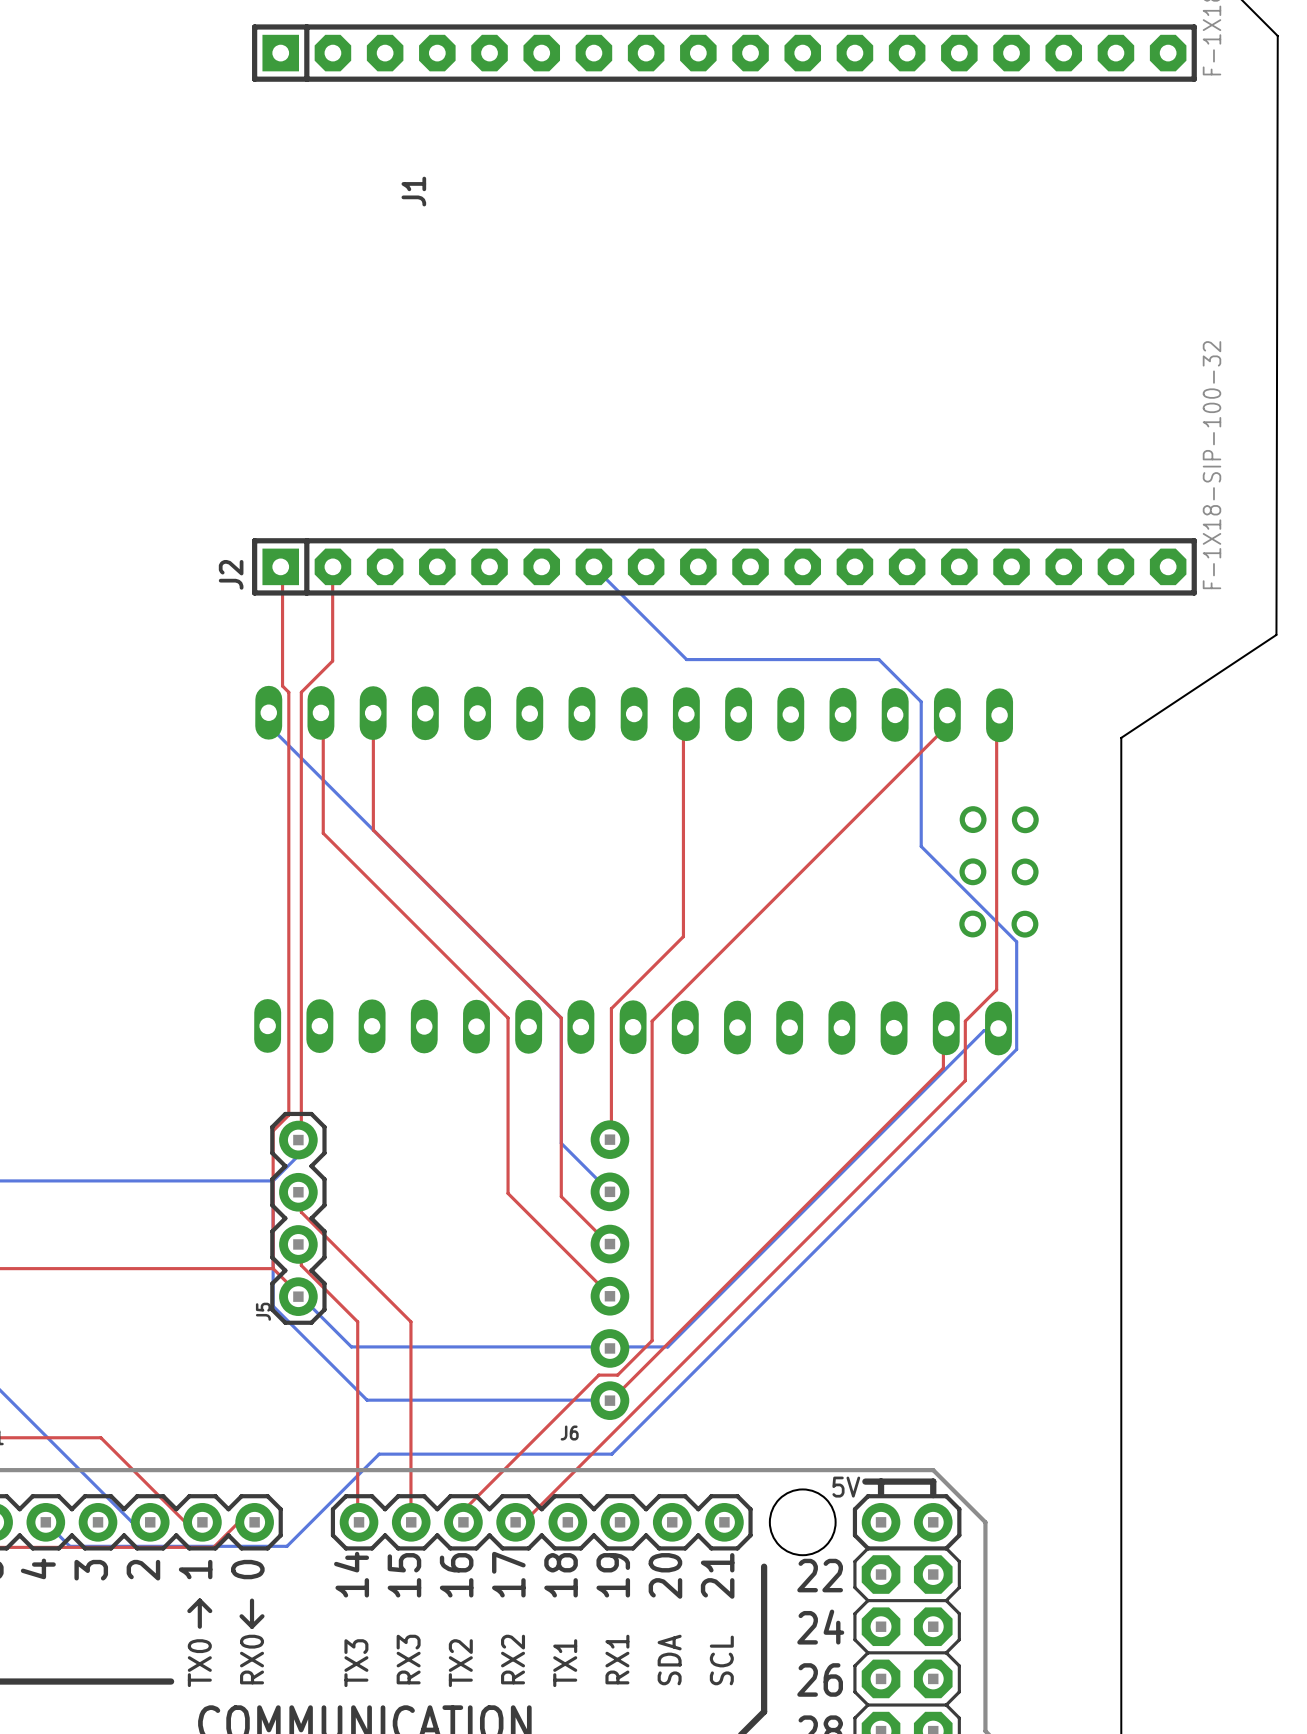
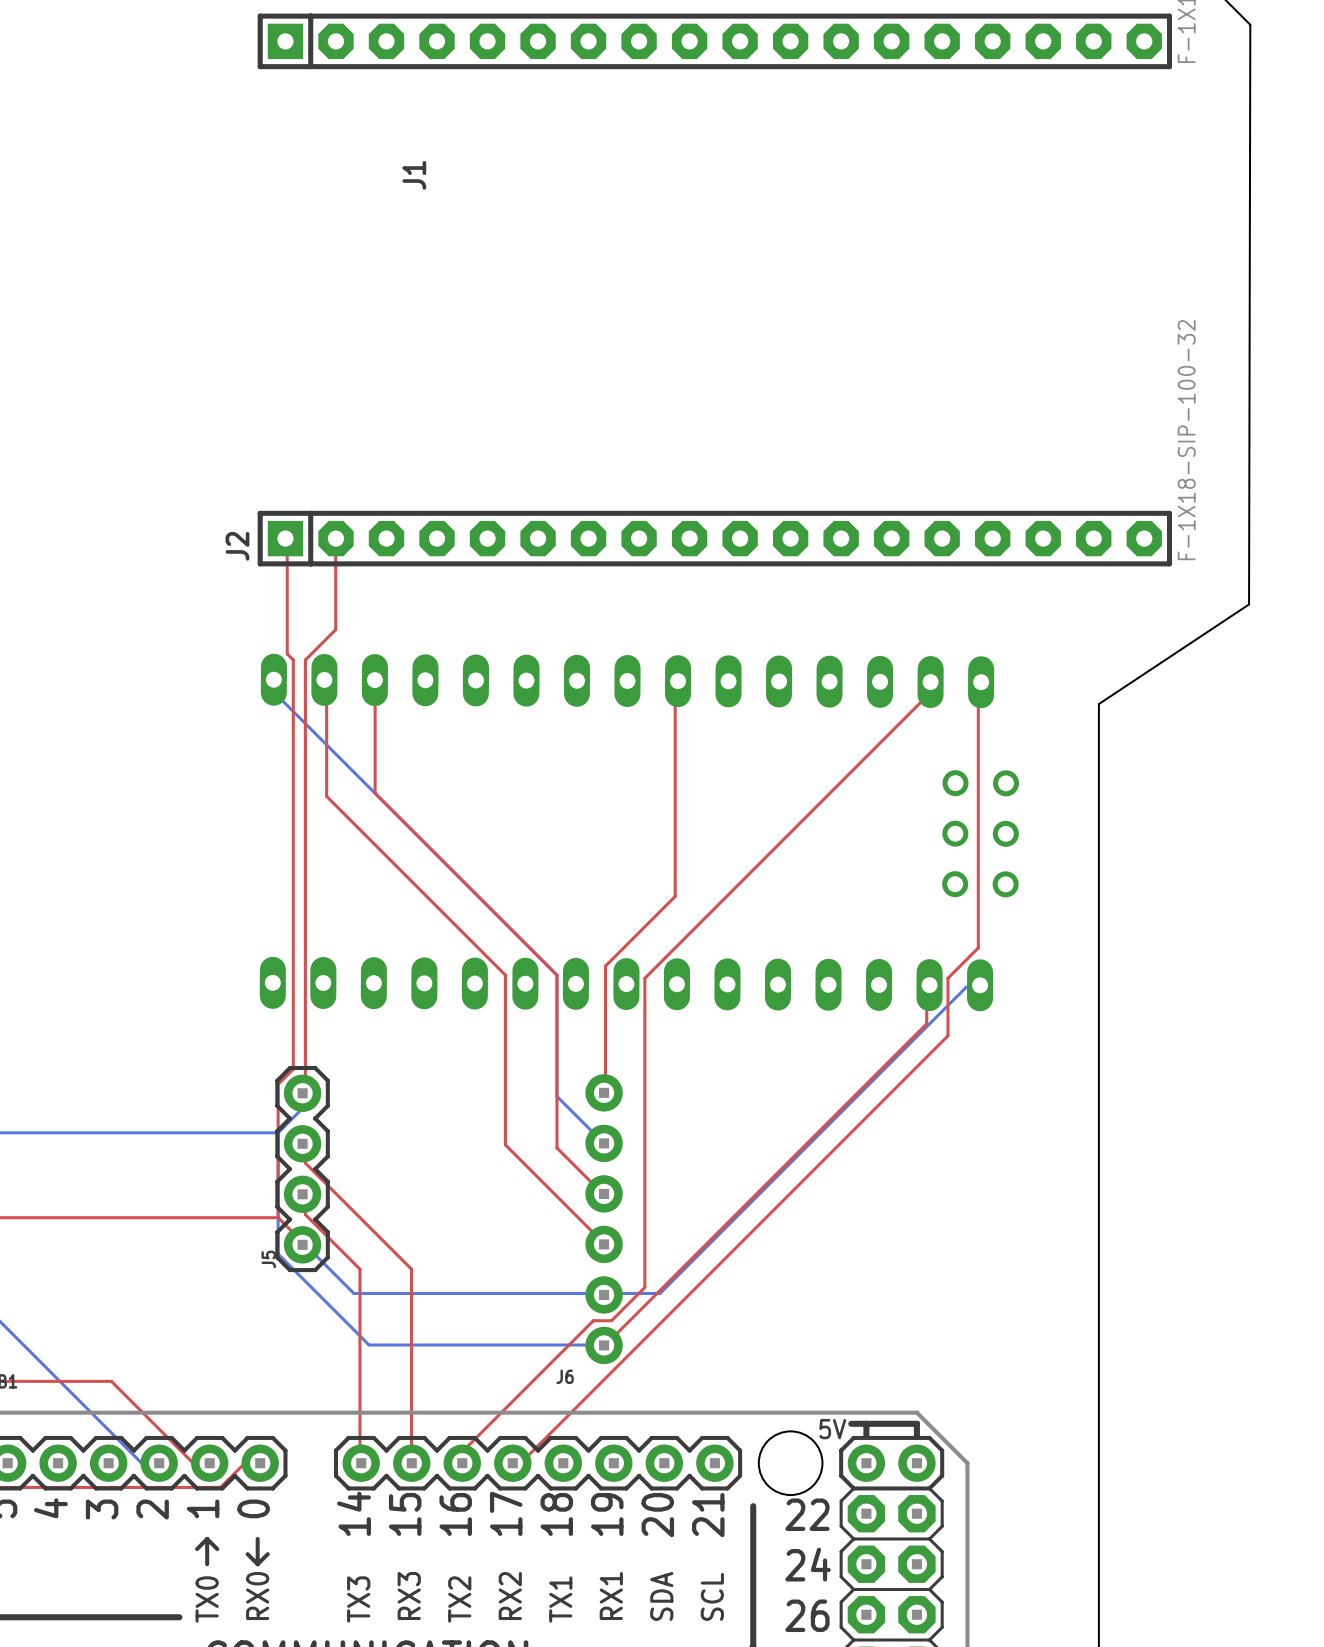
bottom track: (593, 566) (686, 659) (878, 659) (921, 701) (921, 846) (1016, 941) (1016, 1049) (611, 1454) (379, 1454) (286, 1546) (69, 1546) (45, 1522) -> none

